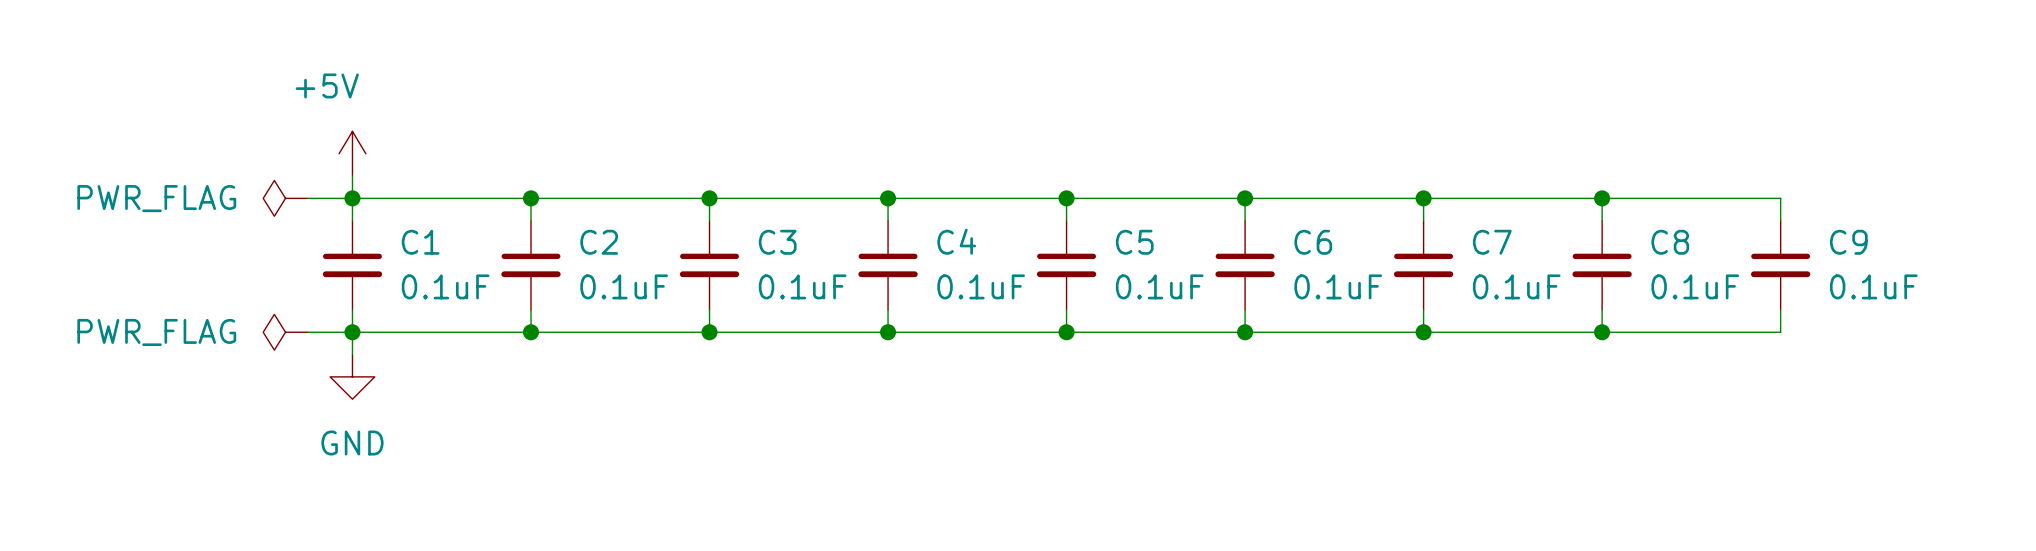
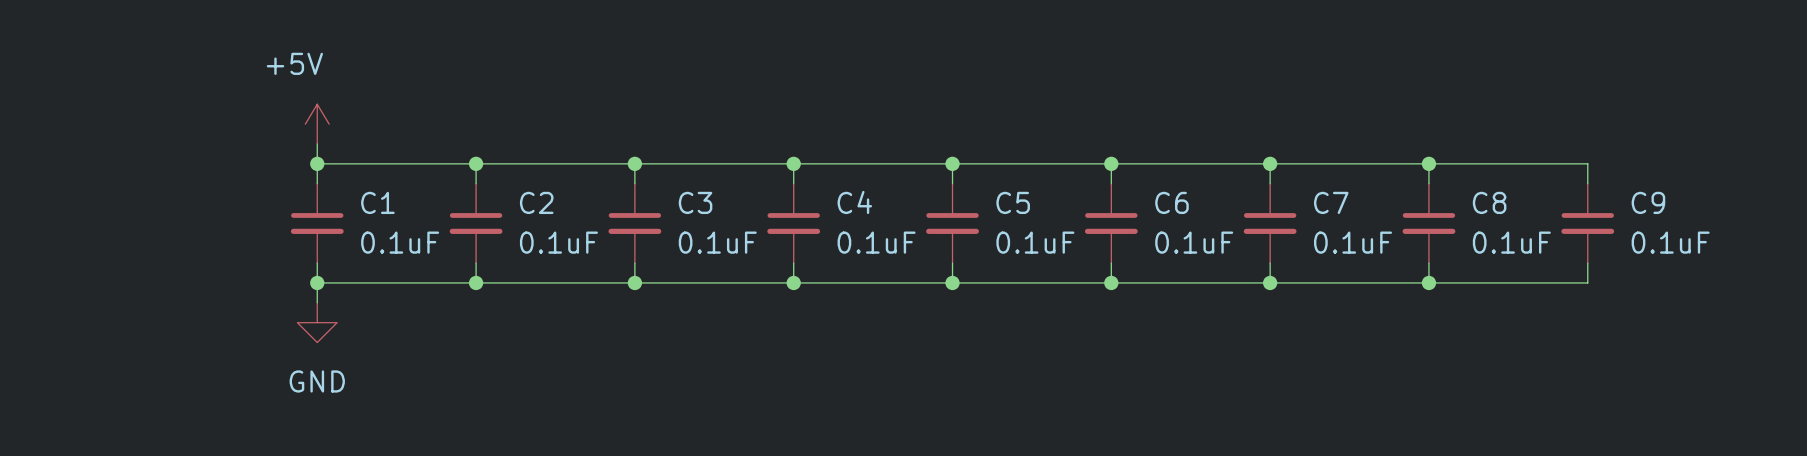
power symbol: PWR_FLAG (285, 198) -> none
wire: (307, 198) (352, 198) -> none
power symbol: PWR_FLAG (285, 332) -> none
wire: (307, 332) (352, 332) -> none

